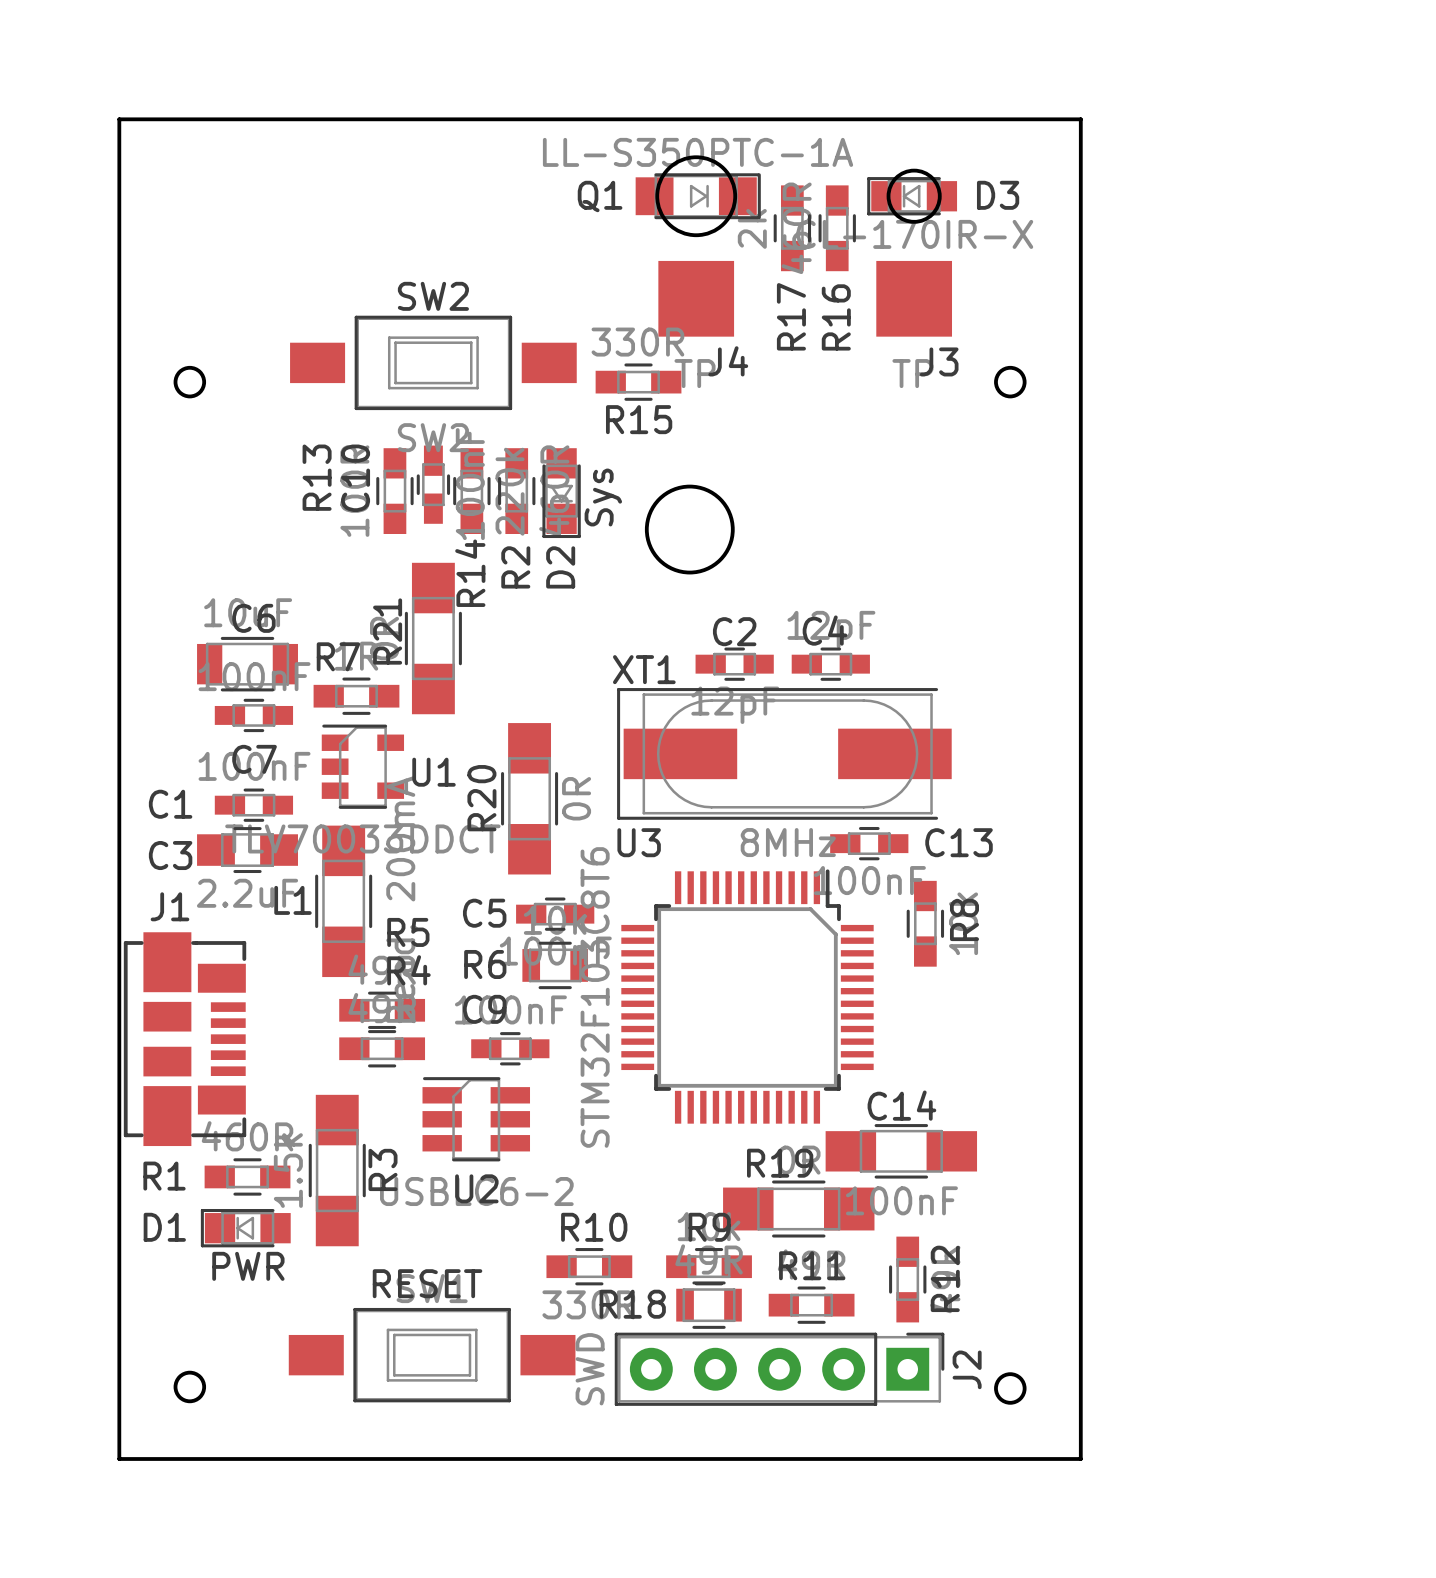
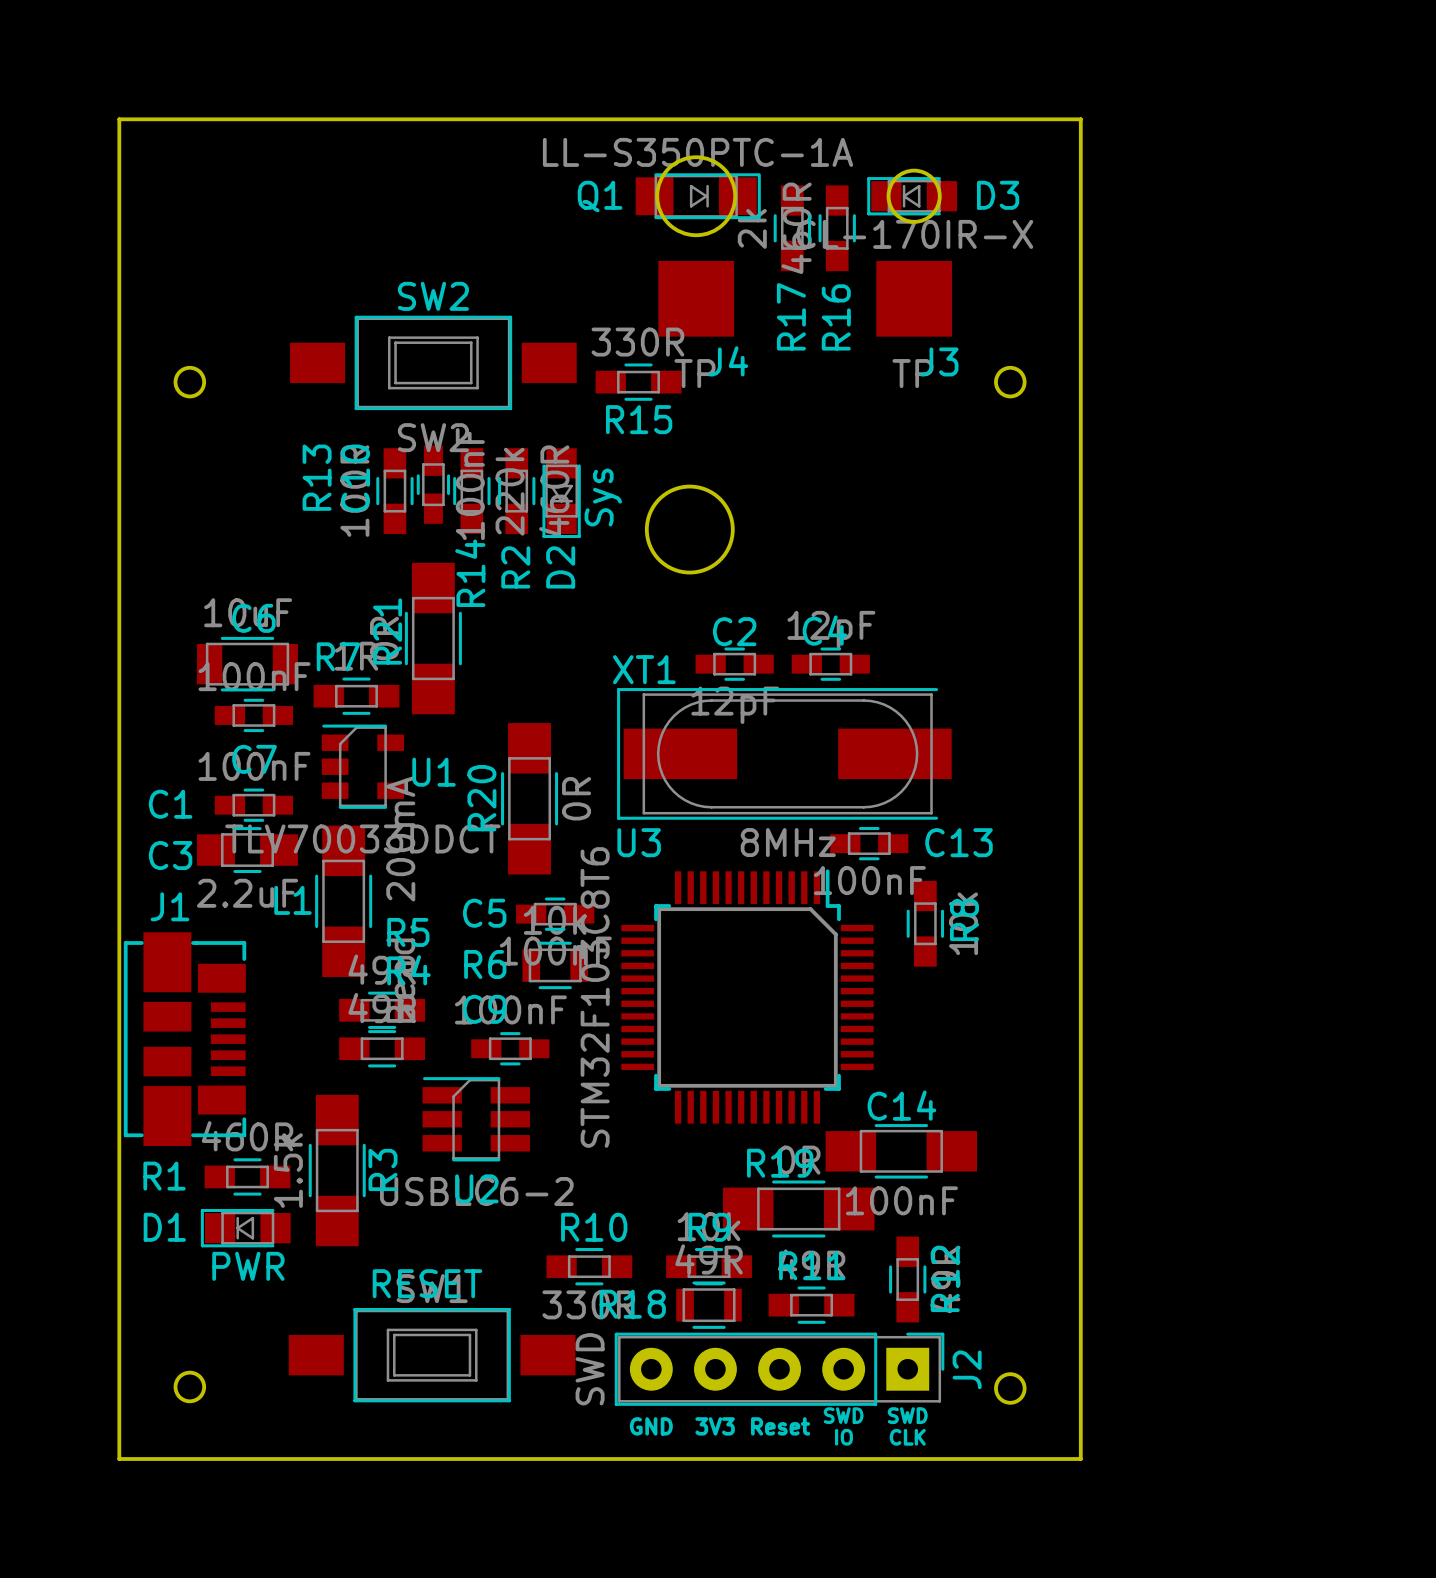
text: none -> SWD (843, 1415)
text: none -> SWD (907, 1415)
text: none -> GND (651, 1426)
text: none -> 3V3 (715, 1426)
text: none -> Reset (780, 1426)
text: none -> IO (843, 1437)
text: none -> CLK (907, 1437)

